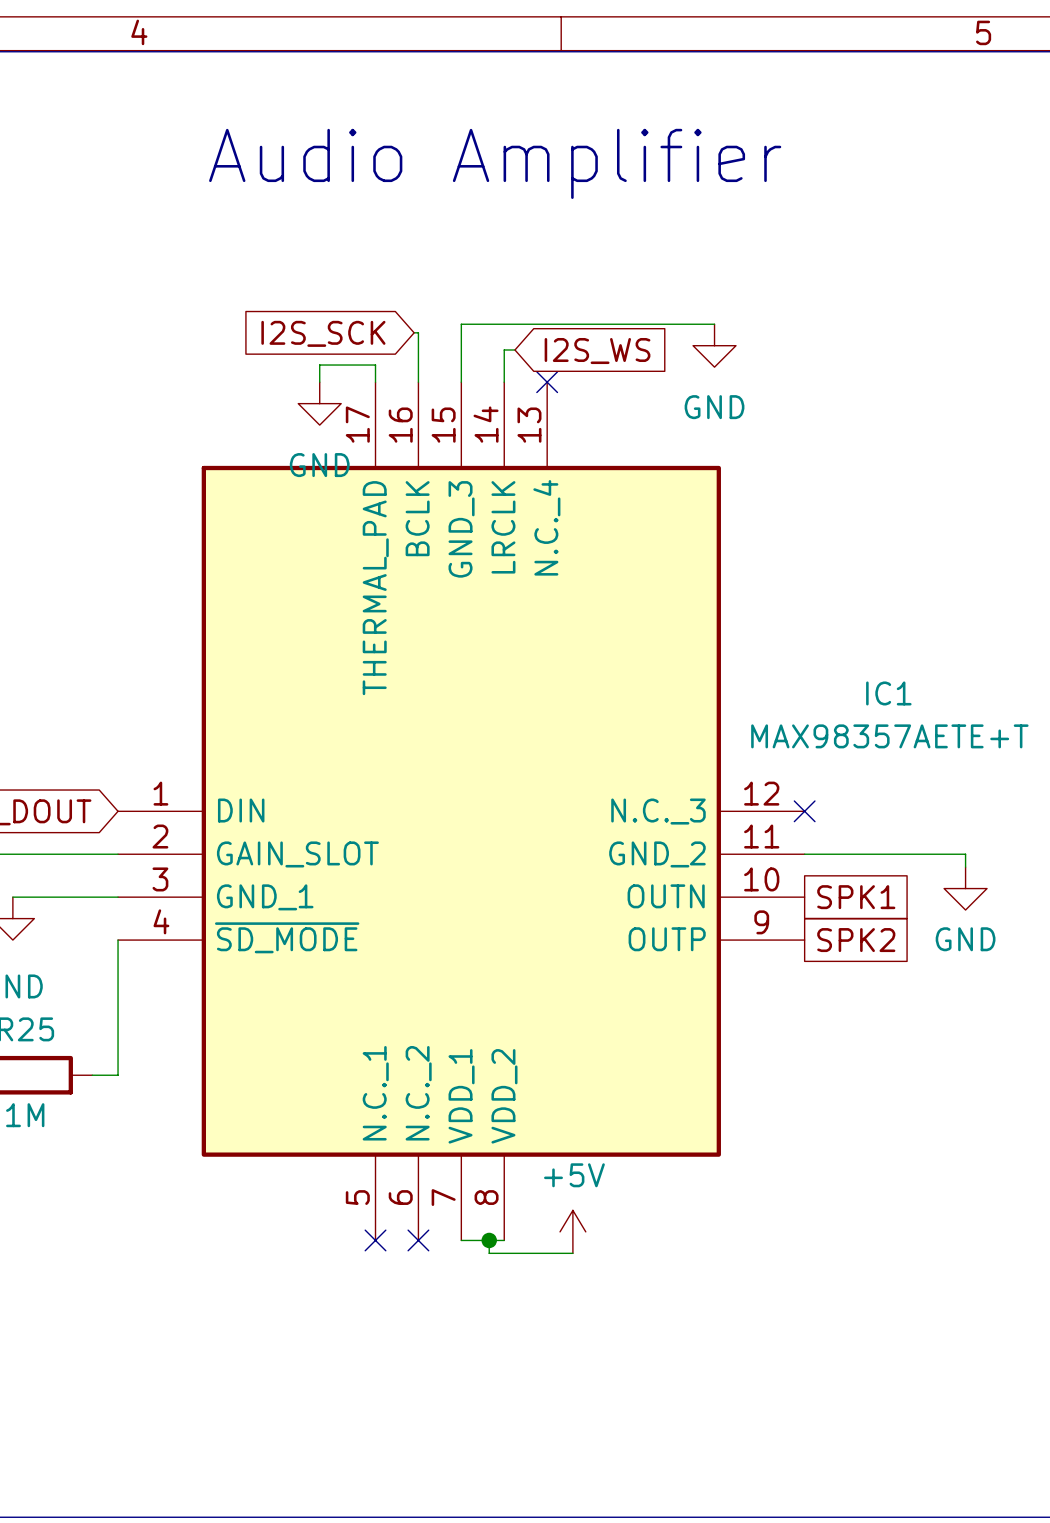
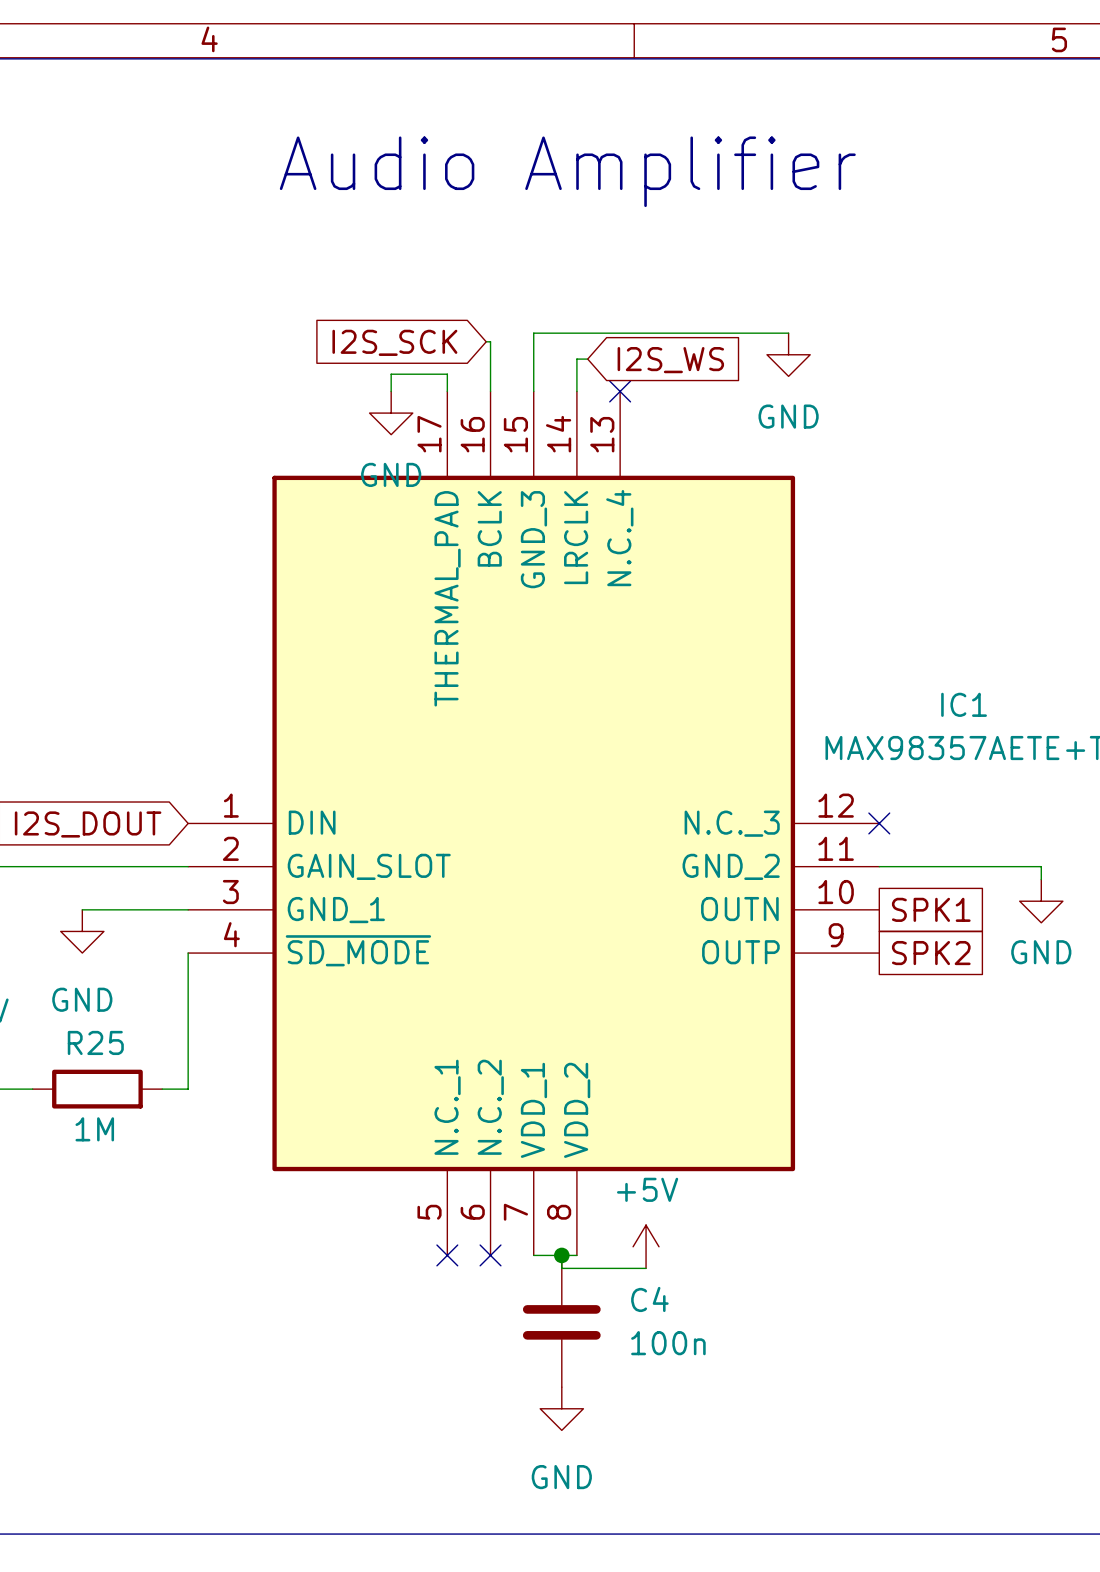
C4: none -> 100n (561, 1322)
power symbol: none -> GND (561, 1408)

